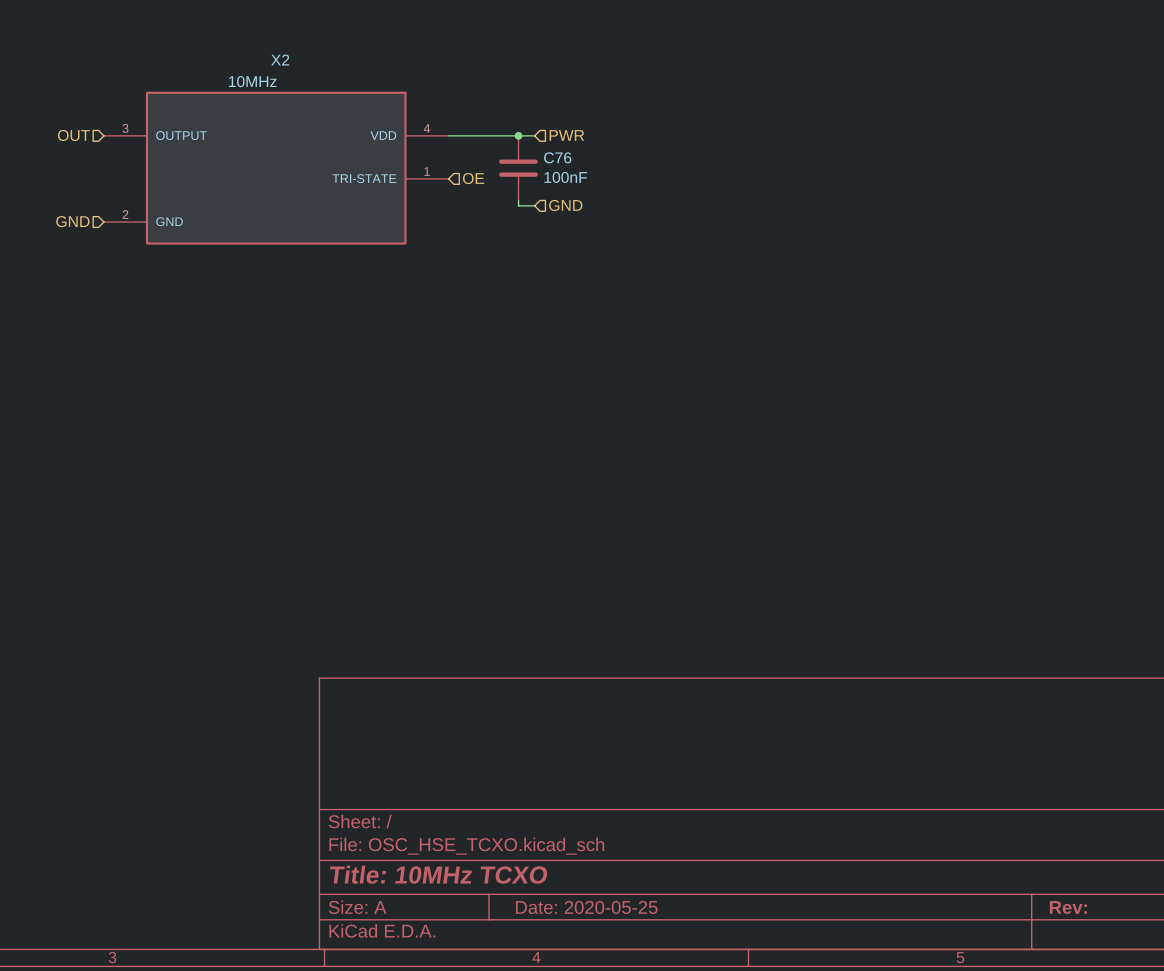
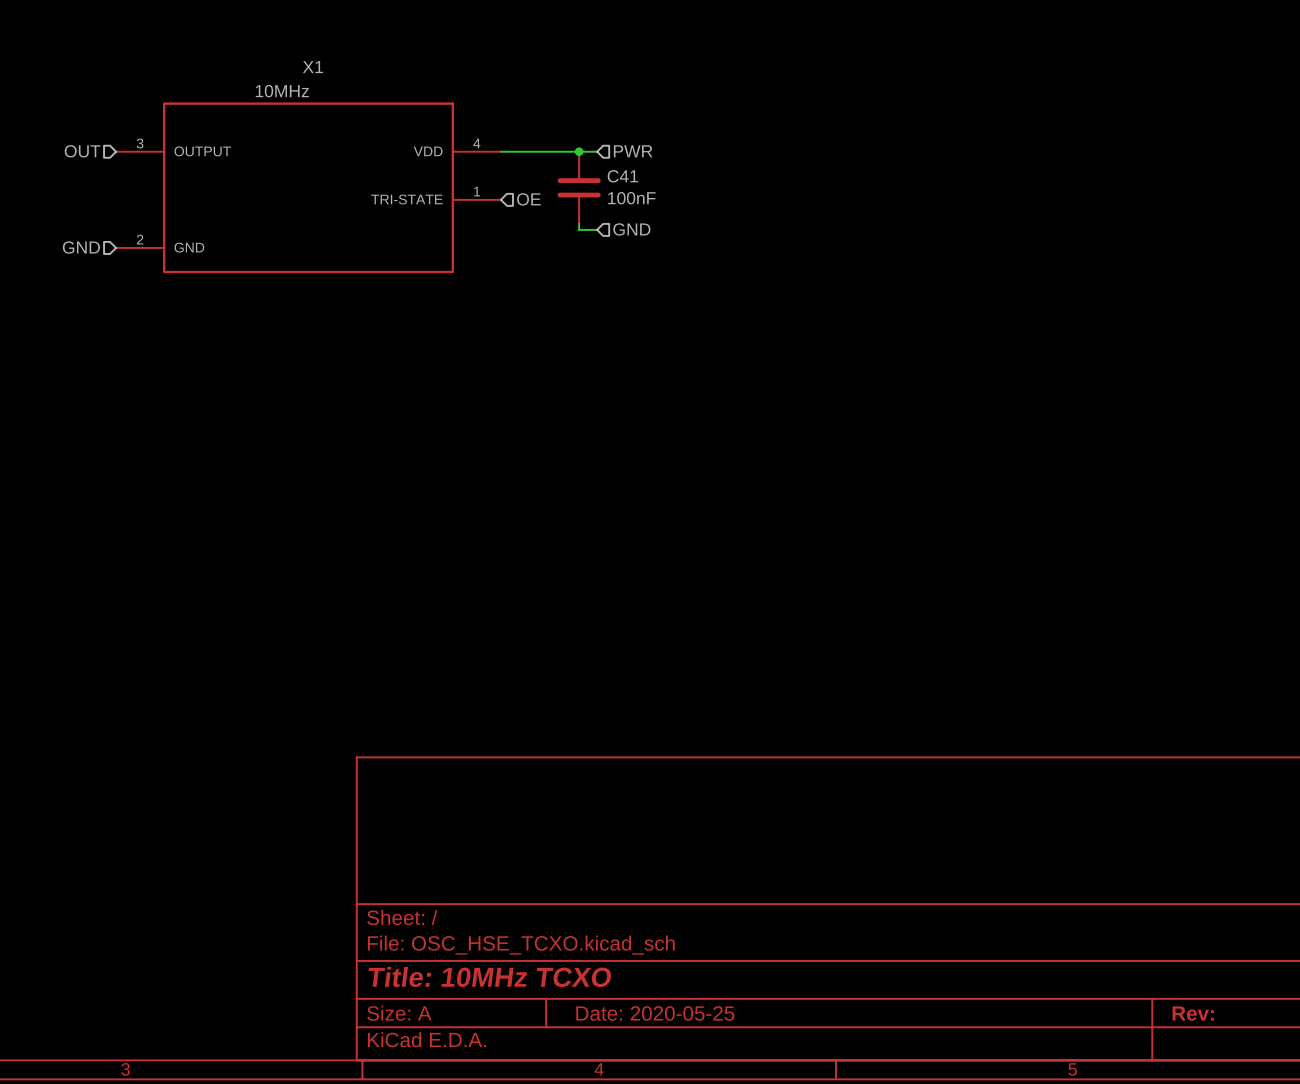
X2 name: X2 (280, 59) -> X1 (312, 67)
C76 name: C76 (557, 157) -> C41 (622, 176)

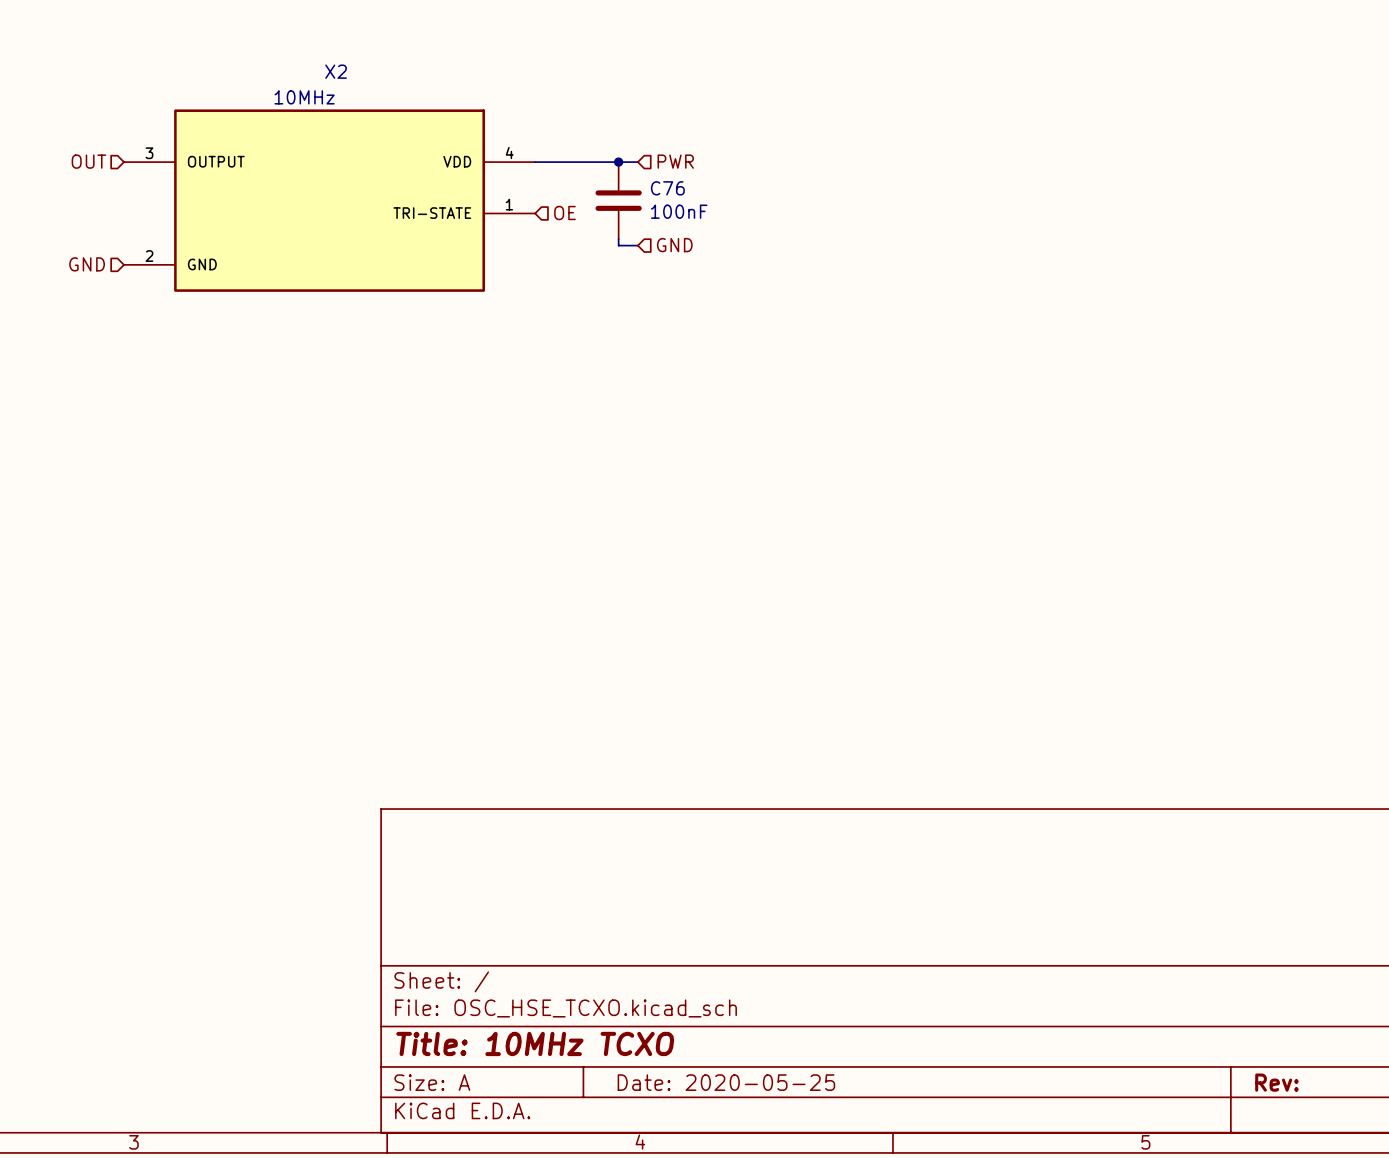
X1 name: X1 (312, 67) -> X2 (336, 71)
C41 name: C41 (622, 176) -> C76 (667, 188)

